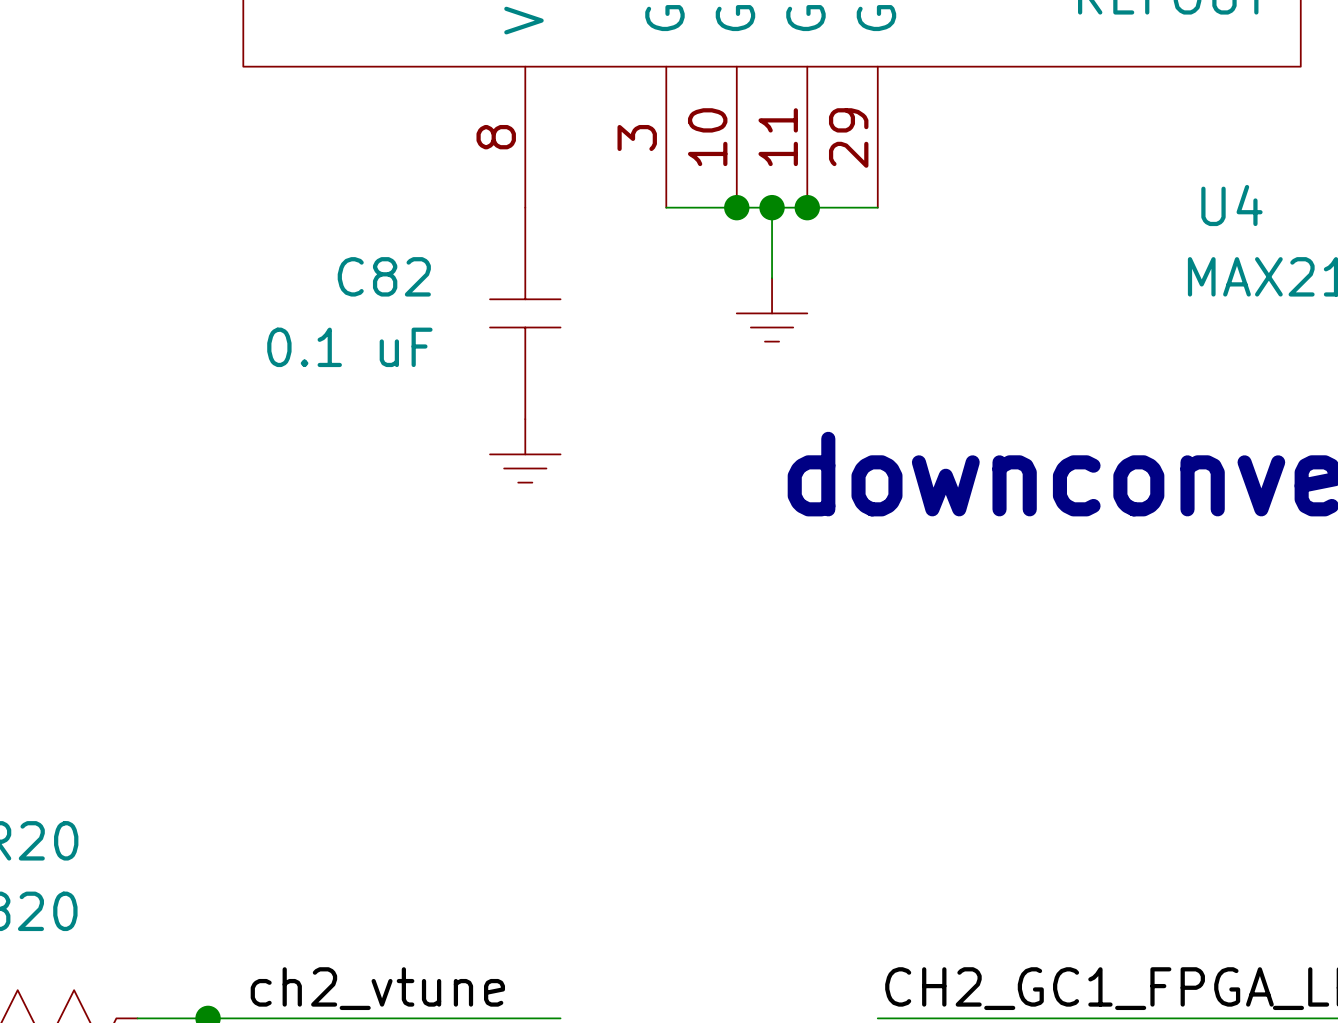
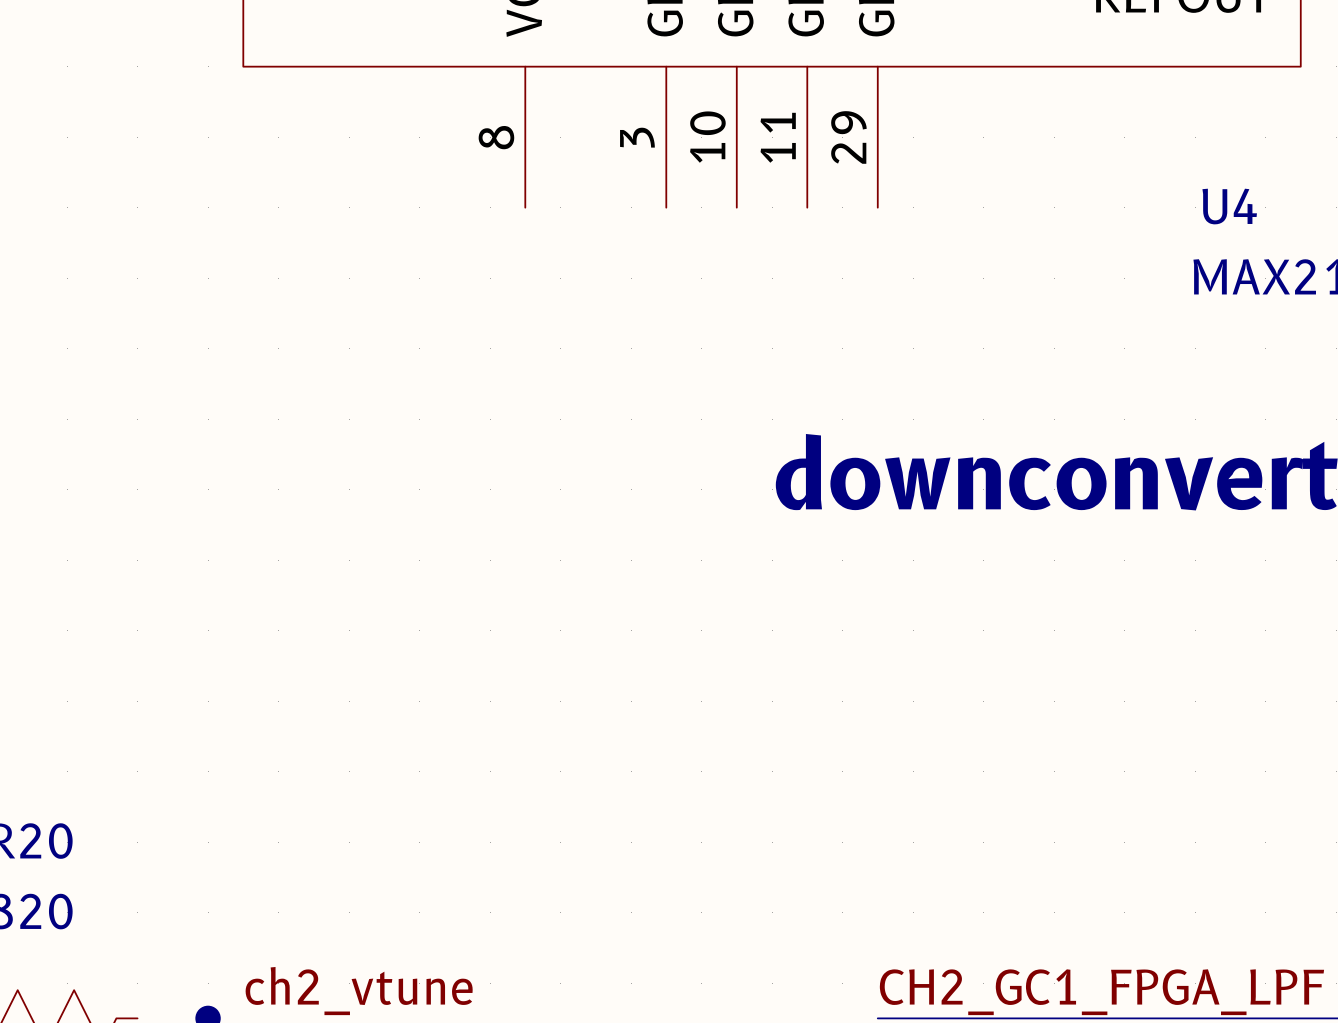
wire: (666, 207) (877, 207) -> none
junction: (736, 207) -> none
wire: (772, 207) (772, 278) -> none
junction: (772, 207) -> none
junction: (807, 207) -> none
power symbol: (772, 309) -> none
C82: 0.1 uF (525, 313) -> none
power symbol: (525, 450) -> none
wire: (137, 1018) (560, 1018) -> none

